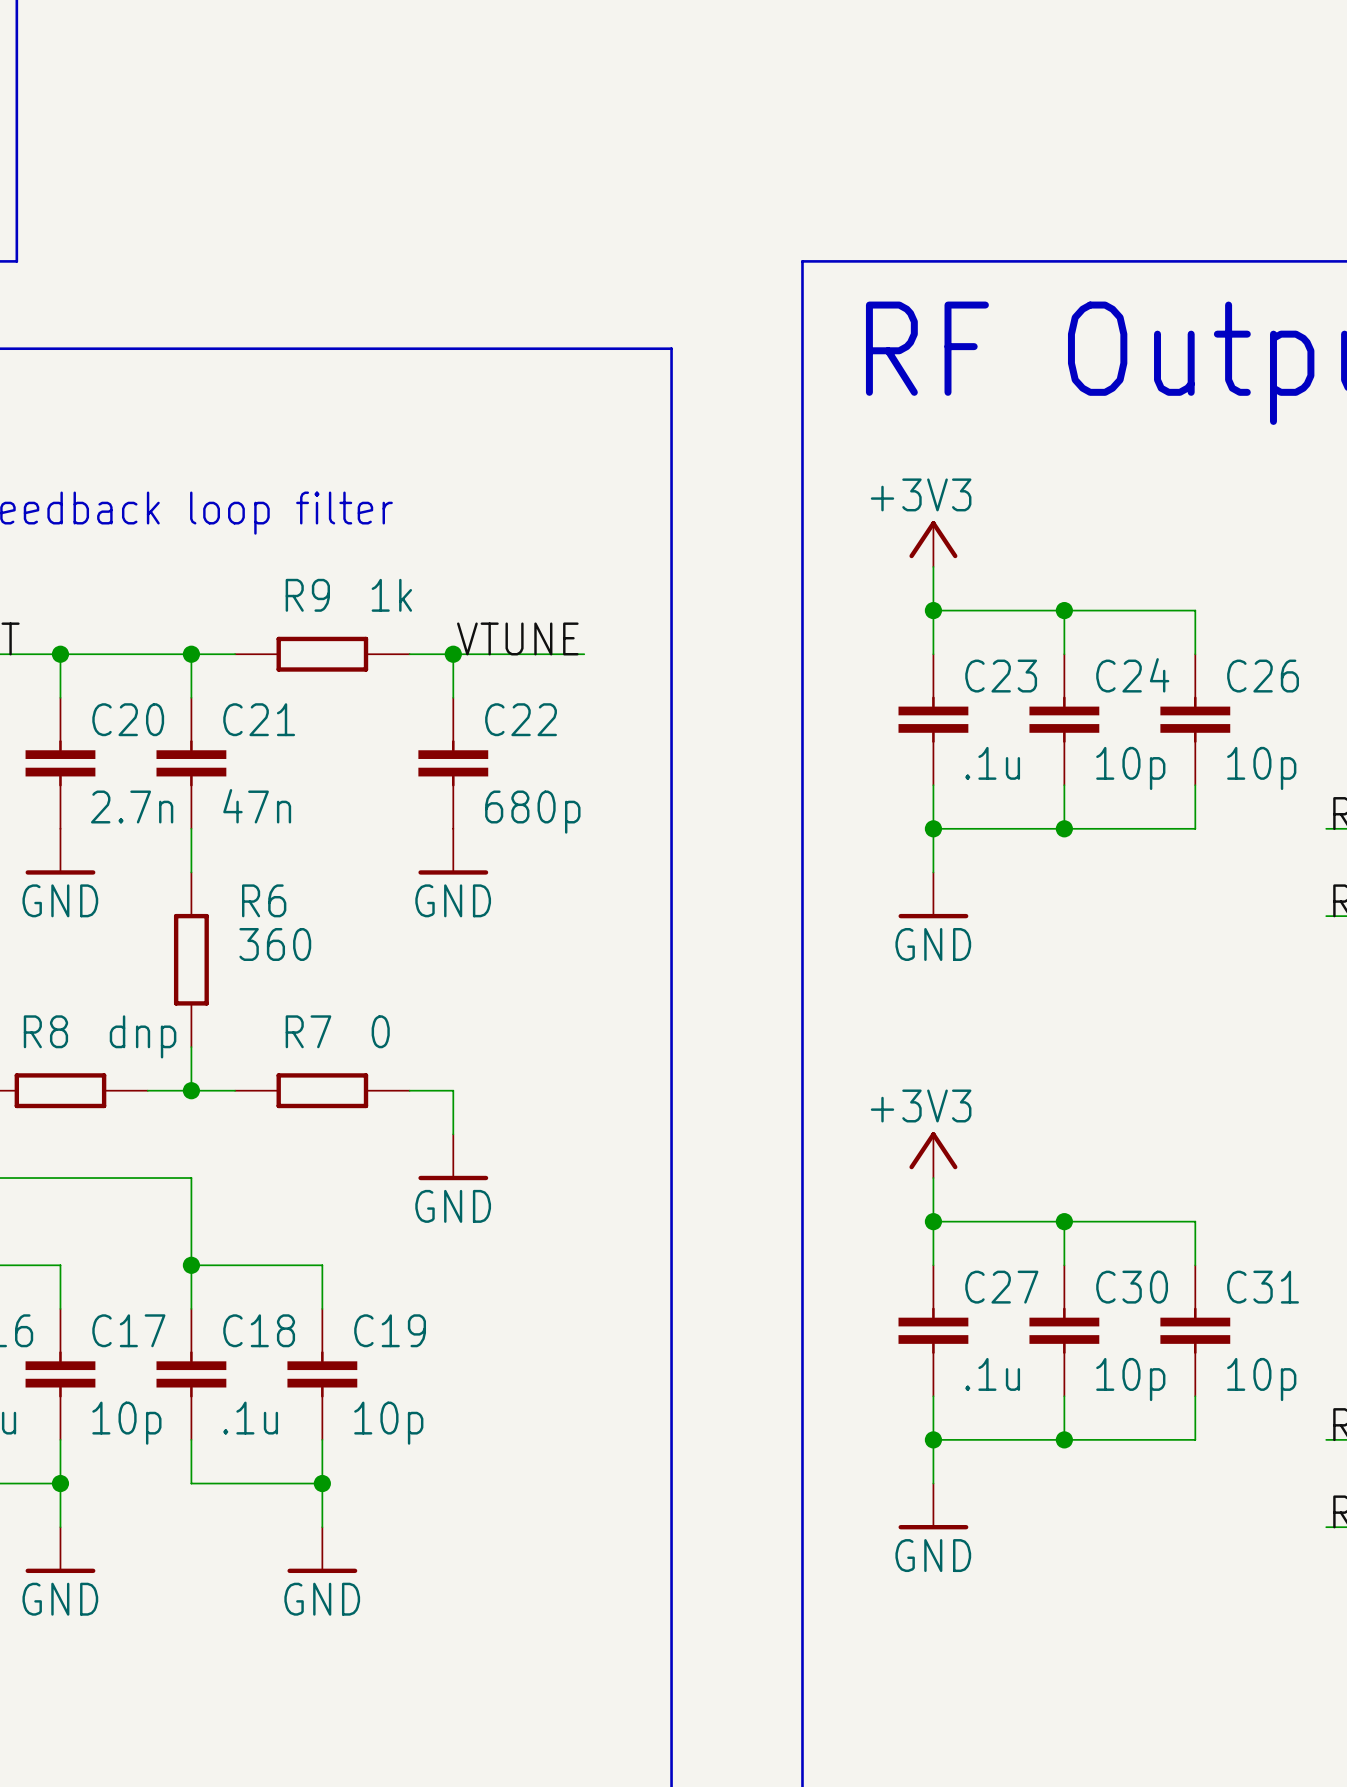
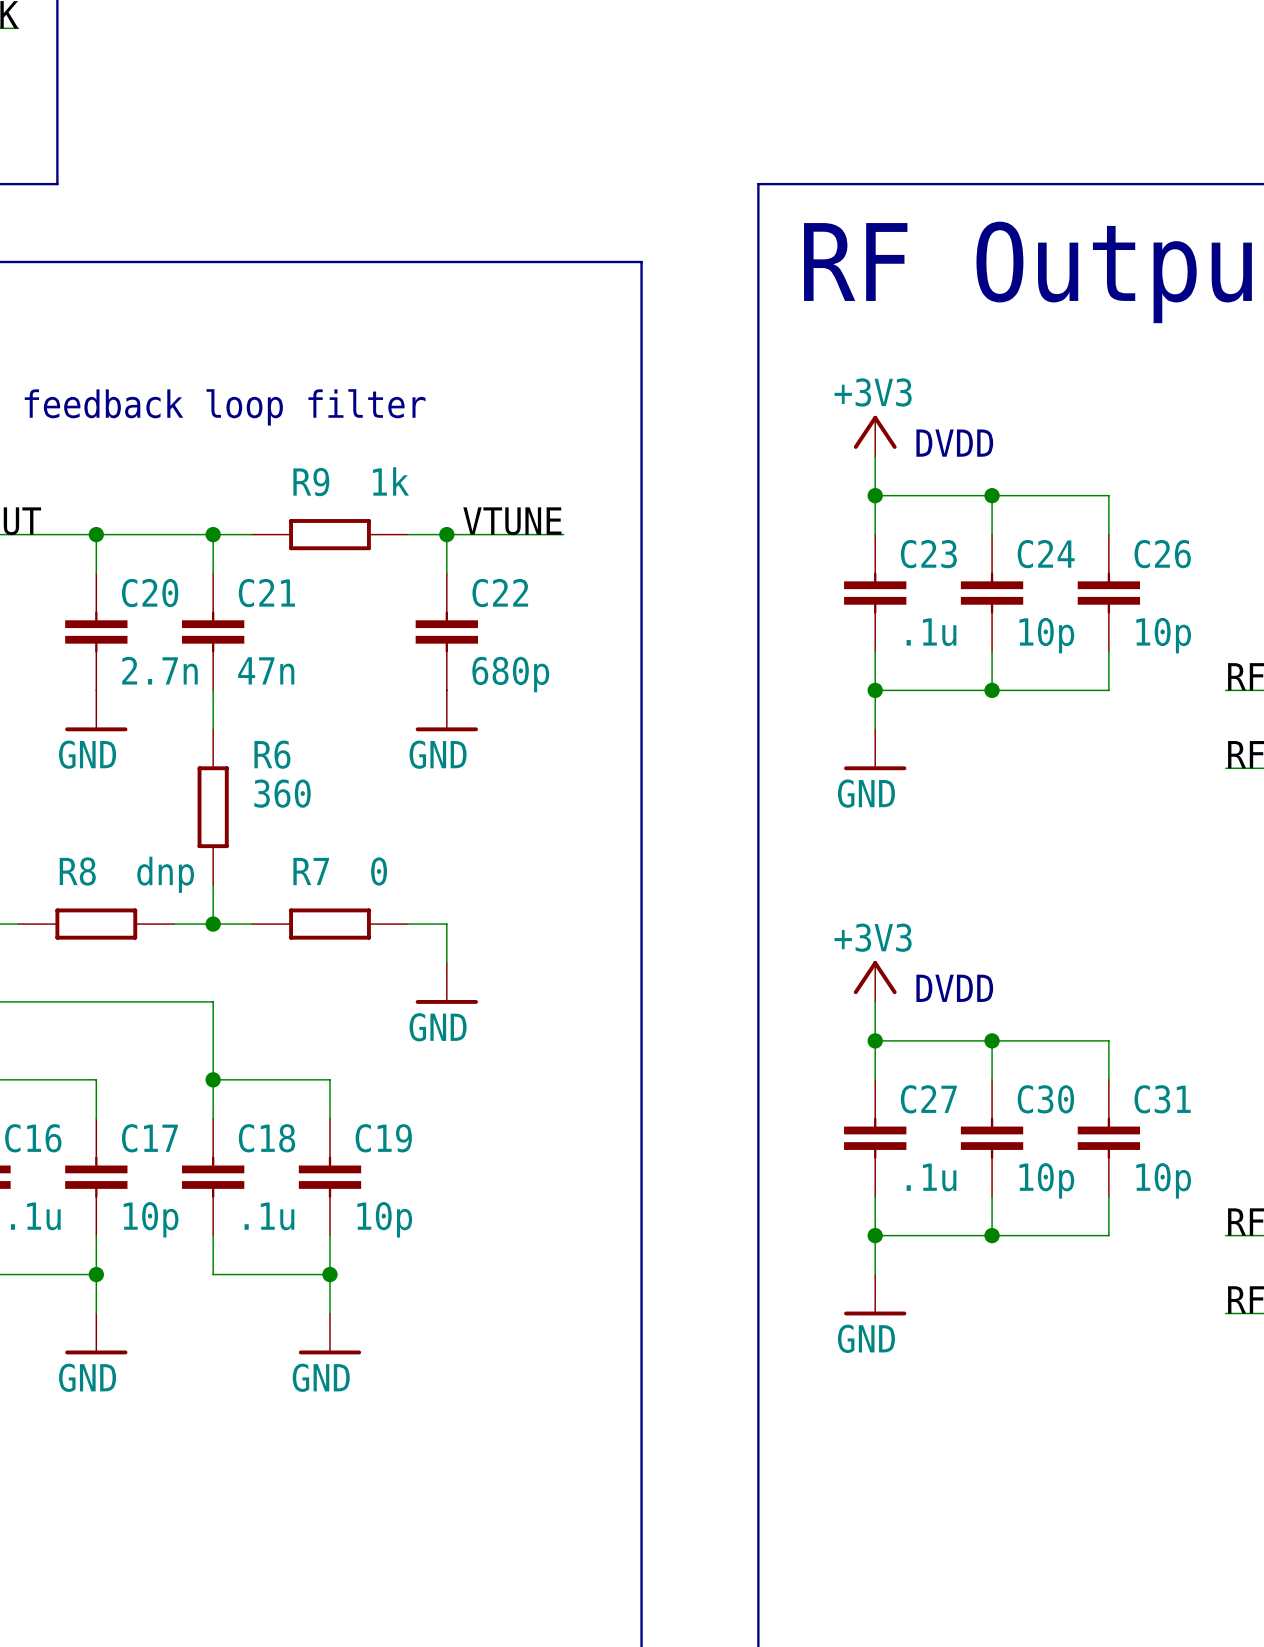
text: none -> DVDD (954, 443)
text: none -> DVDD (954, 988)

